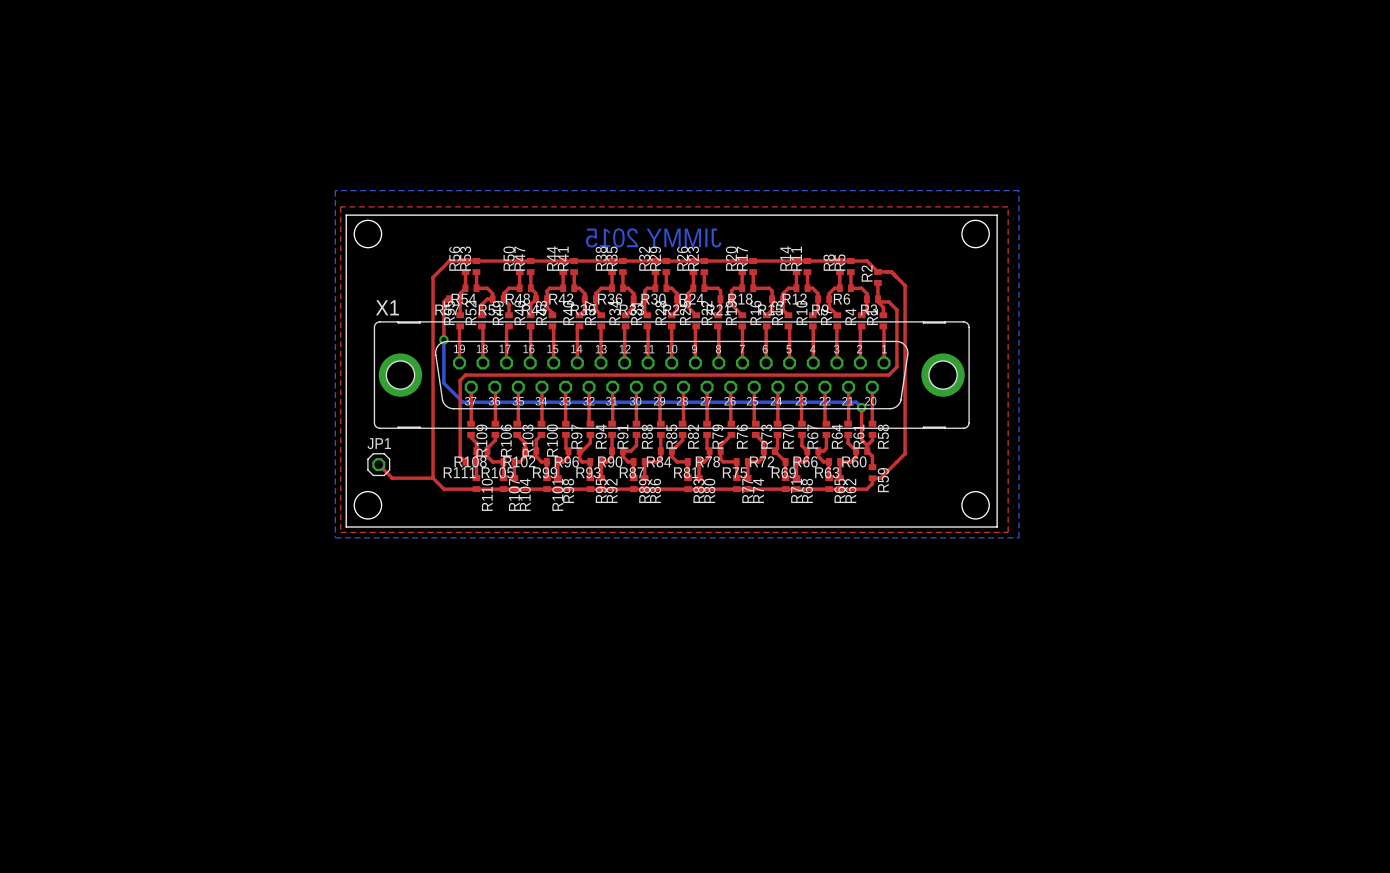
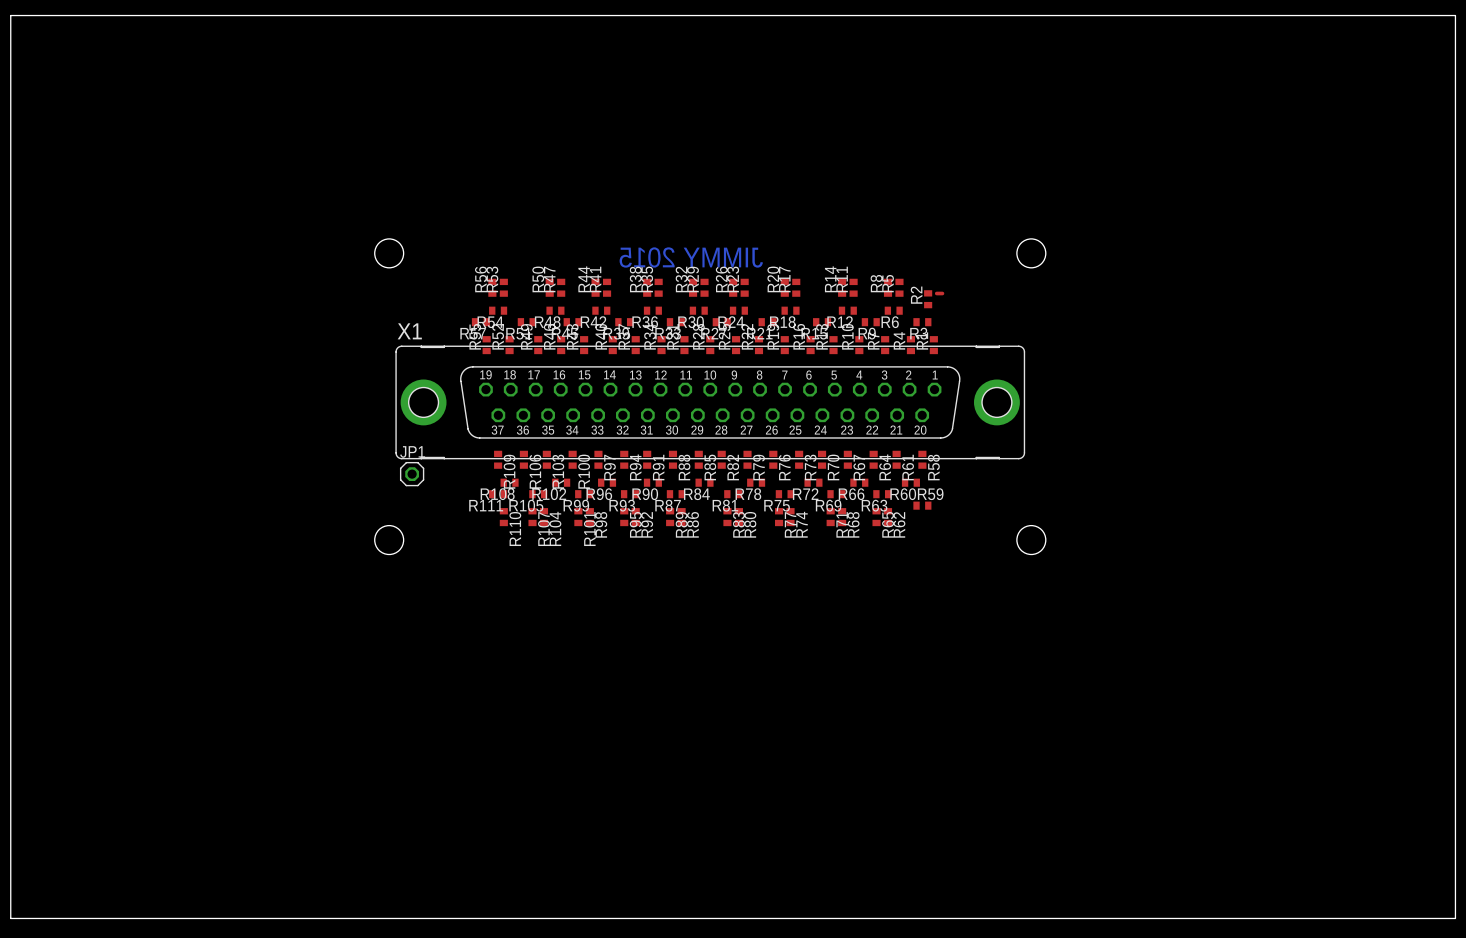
board edge: none -> (10, 15) (1455, 15) (1455, 918) (10, 918) (10, 15)
bottom zone outline: (335, 190) (335, 537) (1018, 537) (1018, 190) (335, 190) -> none
top zone outline: (340, 206) (340, 532) (1008, 532) (1008, 206) (340, 206) -> none
board edge: (346, 215) (997, 215) (997, 526) (346, 526) (346, 215) -> none
top track: (465, 272) (465, 288) (460, 293) (460, 315) -> none
top track: (476, 272) (476, 288) (487, 288) (492, 293) (492, 299) (487, 299) (481, 304) (481, 315) -> none
top track: (519, 272) (519, 288) (508, 288) (503, 293) (503, 299) (508, 304) (508, 315) -> none
top track: (530, 272) (530, 288) (535, 293) (535, 299) (530, 304) (530, 315) -> none
top track: (563, 272) (563, 288) (549, 288) (547, 290) (546, 307) (552, 315) -> none
top track: (574, 272) (574, 288) (579, 288) (584, 293) (584, 309) (579, 315) -> none
top track: (612, 272) (612, 288) (601, 288) (595, 293) (595, 309) (601, 315) -> none
top track: (622, 272) (622, 288) (628, 288) (633, 293) (633, 307) (625, 315) -> none
top track: (655, 272) (655, 288) (647, 288) (644, 290) (644, 312) (647, 315) -> none
top track: (666, 272) (666, 288) (671, 288) (677, 293) (677, 309) (671, 315) -> none
top track: (693, 272) (693, 288) (688, 293) (688, 307) (696, 315) -> none
top track: (704, 272) (704, 288) (717, 288) (720, 290) (720, 312) (717, 315) -> none
top track: (742, 272) (742, 288) (734, 288) (731, 290) (731, 304) (742, 315) -> none
top track: (753, 272) (753, 288) (769, 288) (772, 290) (772, 309) (766, 315) -> none
top track: (796, 272) (796, 288) (788, 288) (782, 293) (783, 309) (788, 315) -> none
top track: (807, 272) (807, 288) (812, 288) (818, 293) (818, 309) (812, 315) -> none
top track: (839, 272) (839, 288) (834, 288) (829, 293) (829, 307) (837, 315) -> none
top track: (850, 272) (850, 288) (861, 288) (867, 293) (866, 309) (861, 315) -> none
top track: (877, 282) (878, 301) -> none
top track: (449, 299) (443, 301) (443, 339) -> none
top track: (878, 301) (883, 307) (883, 315) -> none
top track: (878, 301) (888, 301) (896, 309) (896, 366) (888, 375) (465, 375) (460, 380) (460, 456) (465, 461) -> none
top track: (460, 326) (459, 362) -> none
top track: (481, 326) (482, 362) -> none
top track: (508, 326) (506, 328) (506, 362) -> none
top track: (530, 326) (530, 362) -> none
top track: (552, 326) (553, 362) -> none
top track: (579, 326) (577, 328) (577, 362) -> none
top track: (601, 326) (601, 362) -> none
top track: (625, 326) (624, 362) -> none
top track: (647, 326) (648, 362) -> none
top track: (671, 326) (671, 362) -> none
top track: (696, 326) (695, 362) -> none
top track: (717, 326) (718, 362) -> none
top track: (742, 326) (742, 362) -> none
top track: (766, 326) (766, 362) -> none
top track: (788, 326) (789, 362) -> none
top track: (812, 326) (813, 362) -> none
top track: (837, 326) (836, 362) -> none
top track: (861, 326) (860, 362) -> none
top track: (883, 326) (884, 362) -> none
bottom track: (443, 339) (443, 383) (462, 402) (856, 402) (861, 407) -> none
via: (443, 339) -> none
top track: (471, 387) (471, 423) -> none
top track: (494, 387) (495, 423) -> none
top track: (518, 387) (517, 423) -> none
top track: (541, 387) (541, 423) -> none
top track: (565, 387) (565, 423) -> none
top track: (589, 387) (590, 423) -> none
top track: (612, 387) (612, 423) -> none
top track: (636, 387) (636, 423) -> none
top track: (660, 387) (660, 423) -> none
top track: (683, 387) (682, 423) -> none
top track: (707, 387) (707, 423) -> none
top track: (730, 387) (731, 423) -> none
top track: (754, 387) (754, 422) (755, 423) -> none
top track: (777, 387) (777, 423) -> none
top track: (801, 387) (801, 423) -> none
top track: (824, 387) (826, 423) -> none
top track: (848, 387) (848, 423) -> none
top track: (872, 387) (872, 423) -> none
top track: (861, 407) (861, 439) (867, 445) -> none
via: (861, 407) -> none
top track: (471, 434) (476, 442) (476, 478) -> none
top track: (495, 434) (495, 440) (487, 448) (487, 456) (492, 461) (503, 462) (503, 478) -> none
top track: (517, 434) (525, 442) (525, 456) (519, 461) (514, 462) (514, 478) -> none
top track: (541, 434) (536, 440) (536, 456) (541, 461) (546, 462) (546, 478) -> none
top track: (565, 434) (565, 448) (568, 451) (568, 456) (563, 461) (557, 462) (557, 478) -> none
top track: (590, 434) (590, 442) (582, 451) (579, 451) (579, 459) (582, 461) (590, 462) (590, 478) -> none
top track: (612, 434) (611, 456) (606, 461) (601, 462) (601, 478) -> none
top track: (636, 434) (636, 445) (631, 451) (622, 451) (622, 456) (628, 461) (633, 461) (633, 478) -> none
top track: (660, 434) (660, 459) (658, 461) (644, 461) (644, 478) -> none
top track: (682, 434) (682, 440) (671, 450) (671, 456) (677, 461) (687, 461) (687, 478) -> none
top track: (707, 434) (707, 448) (709, 451) (709, 456) (704, 461) (699, 461) (699, 478) -> none
top track: (731, 434) (720, 445) (720, 459) (723, 461) (736, 461) (736, 478) -> none
top track: (755, 434) (763, 442) (763, 456) (758, 461) (747, 461) (747, 478) -> none
top track: (777, 434) (777, 448) (774, 451) (785, 462) (785, 478) -> none
top track: (801, 434) (801, 445) (807, 451) (807, 459) (804, 461) (796, 462) (796, 478) -> none
top track: (826, 434) (826, 448) (823, 451) (818, 451) (818, 456) (823, 461) (829, 462) (829, 478) -> none
top track: (848, 434) (848, 443) (856, 451) (856, 456) (850, 461) (839, 462) (839, 478) -> none
top track: (872, 434) (872, 440) (867, 445) -> none
top track: (867, 445) (867, 451) (872, 456) (872, 467) -> none
top track: (378, 464) (392, 478) (433, 478) -> none
JP1 position: (378, 464) -> (412, 474)
R59 rotation: 0° (872, 472) -> 90° clockwise (922, 505)
top track: (433, 478) (444, 489) (866, 489) (872, 483) (872, 478) (880, 478) (905, 453) (905, 285) (891, 271) (877, 271) (867, 261) (449, 261) (433, 277) (433, 478) -> none
R59 name position: R59 (883, 480) -> R59 (930, 494)

